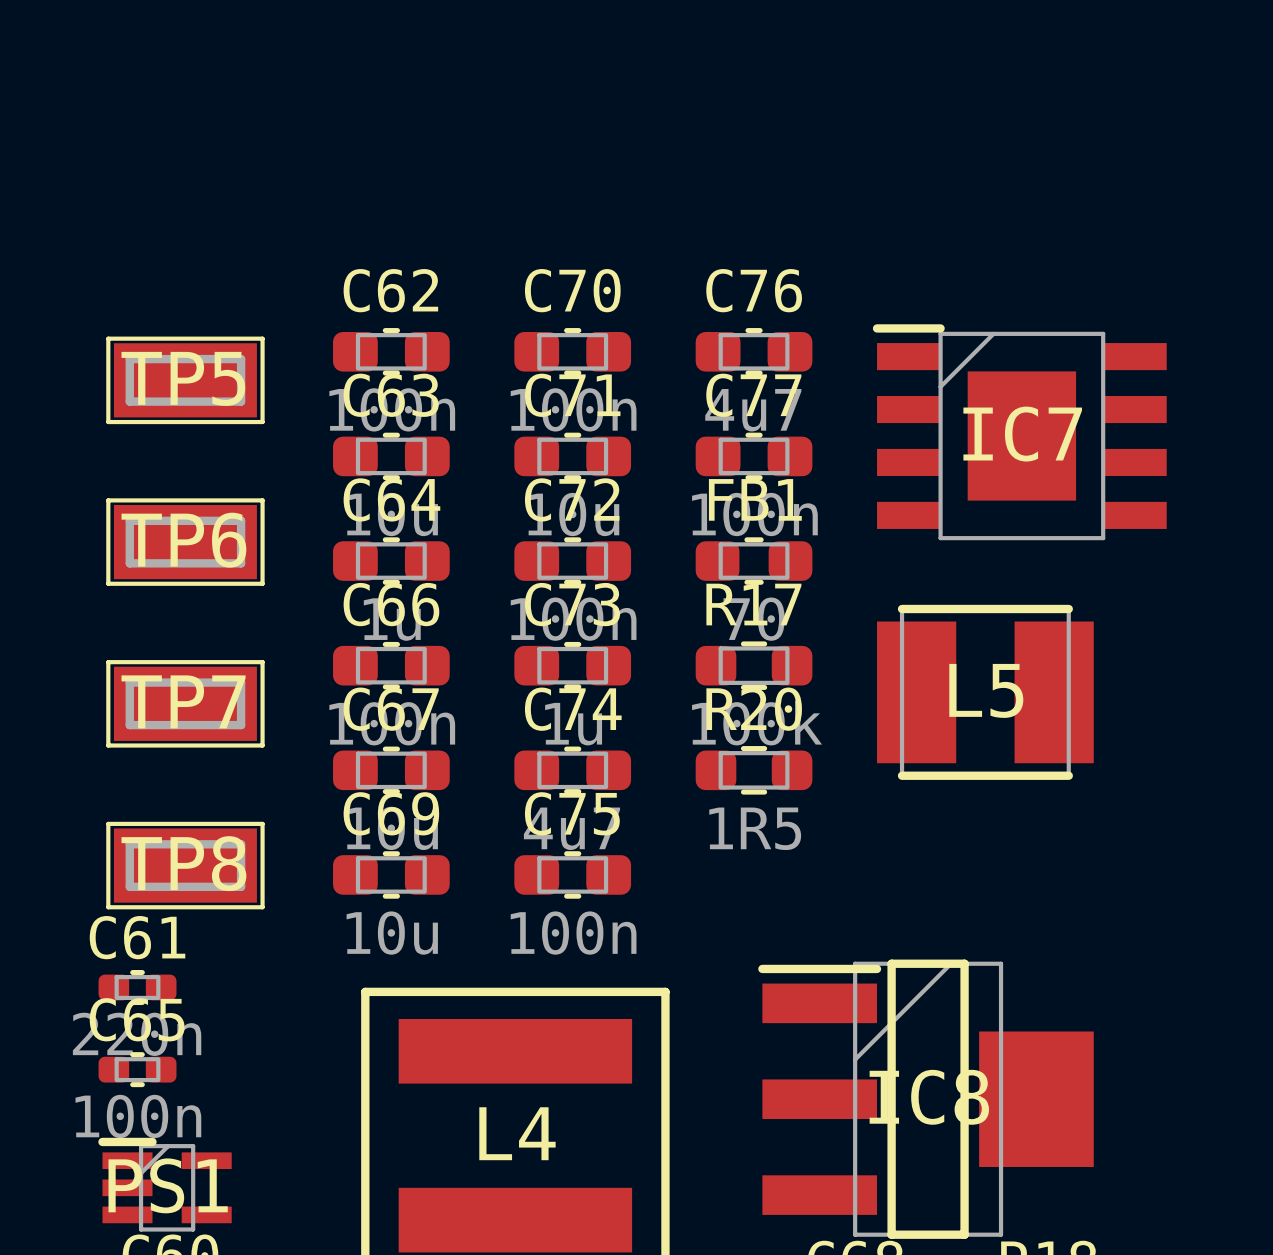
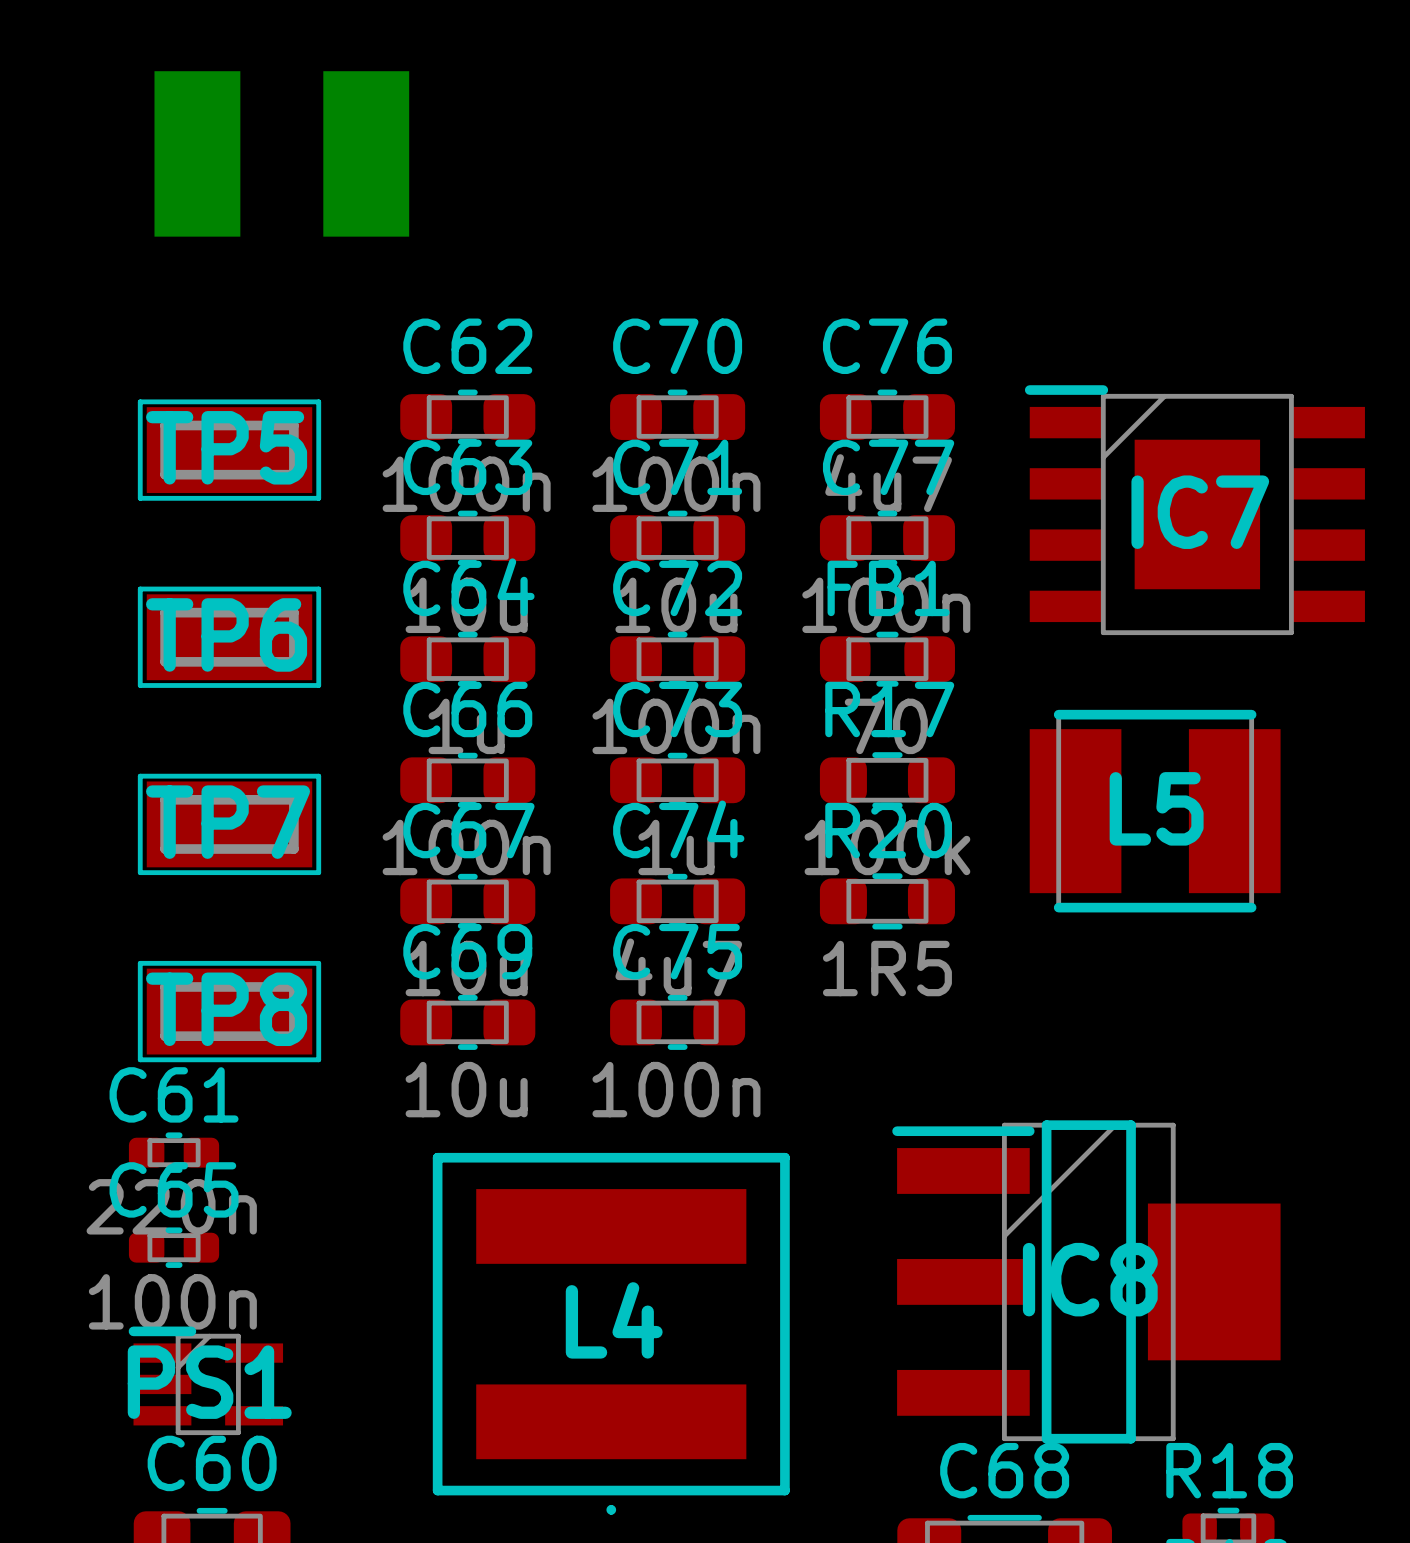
part: none -> (197, 153)
part: none -> (366, 153)

